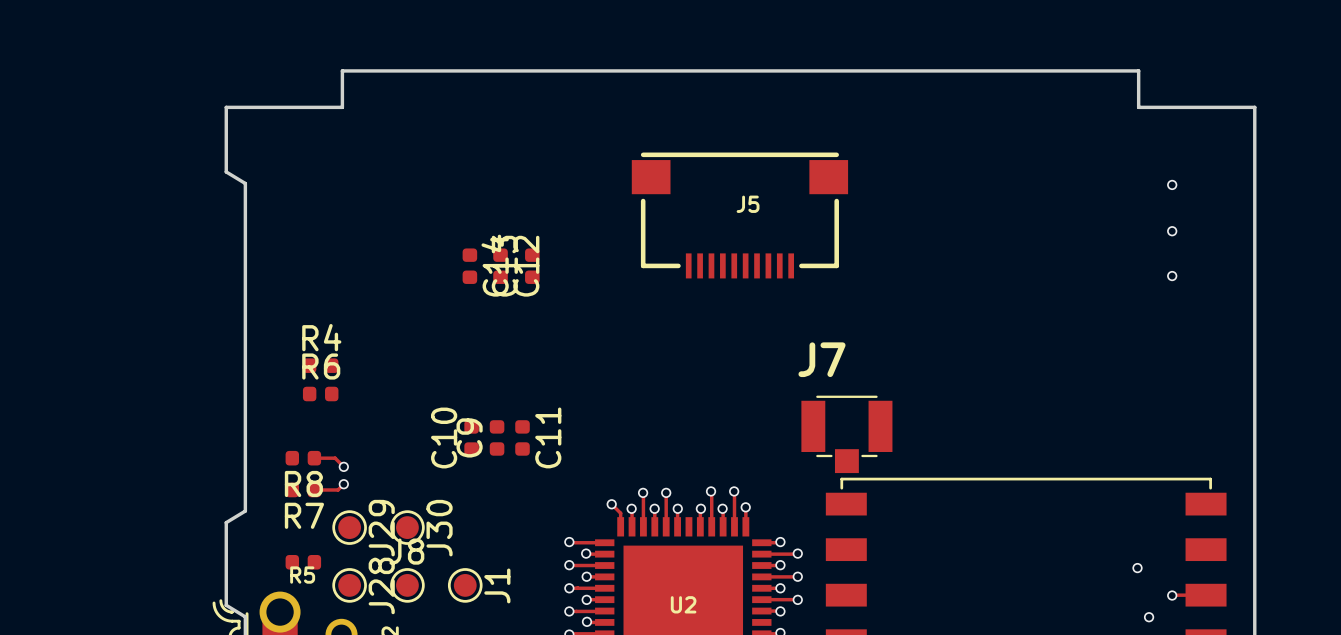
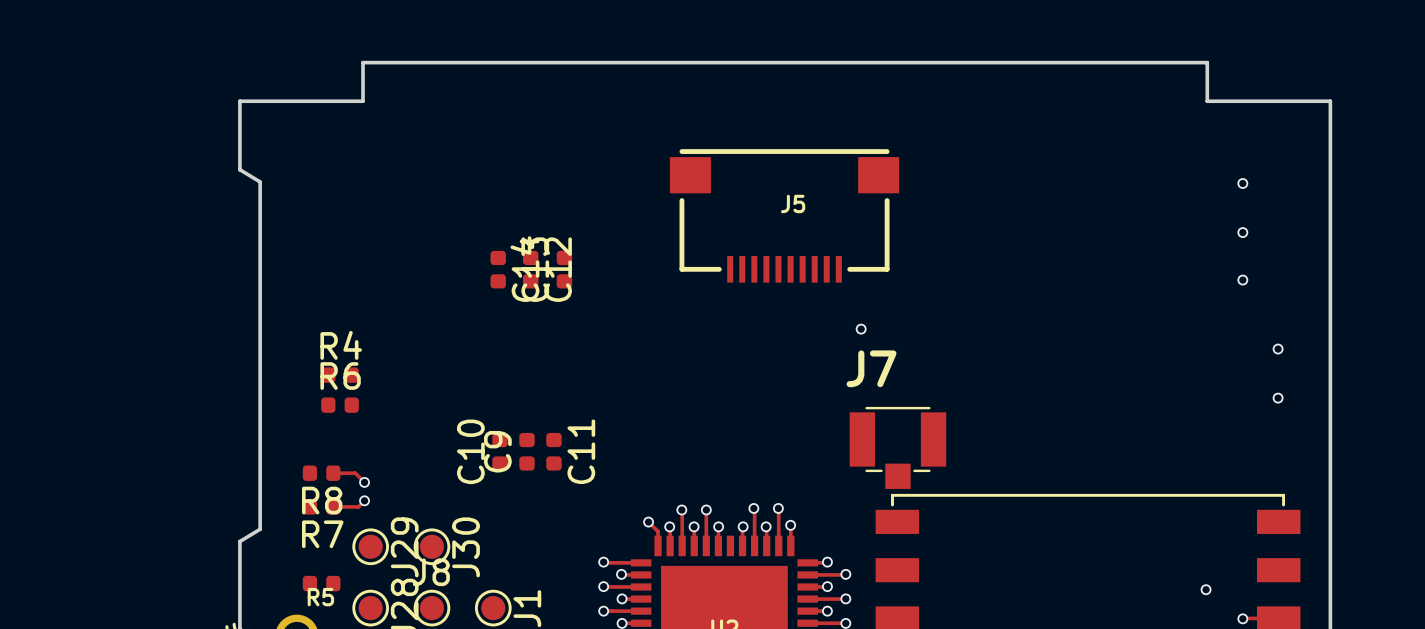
via: none -> (861, 329)
via: none -> (1278, 349)
via: none -> (1278, 398)

